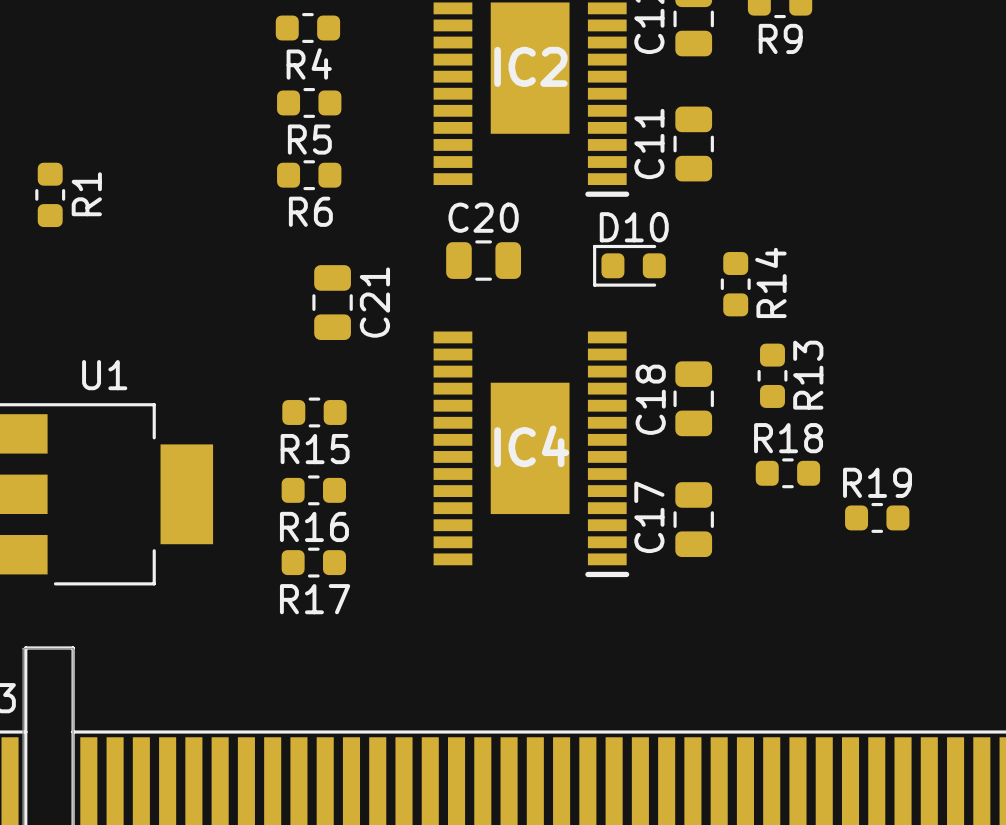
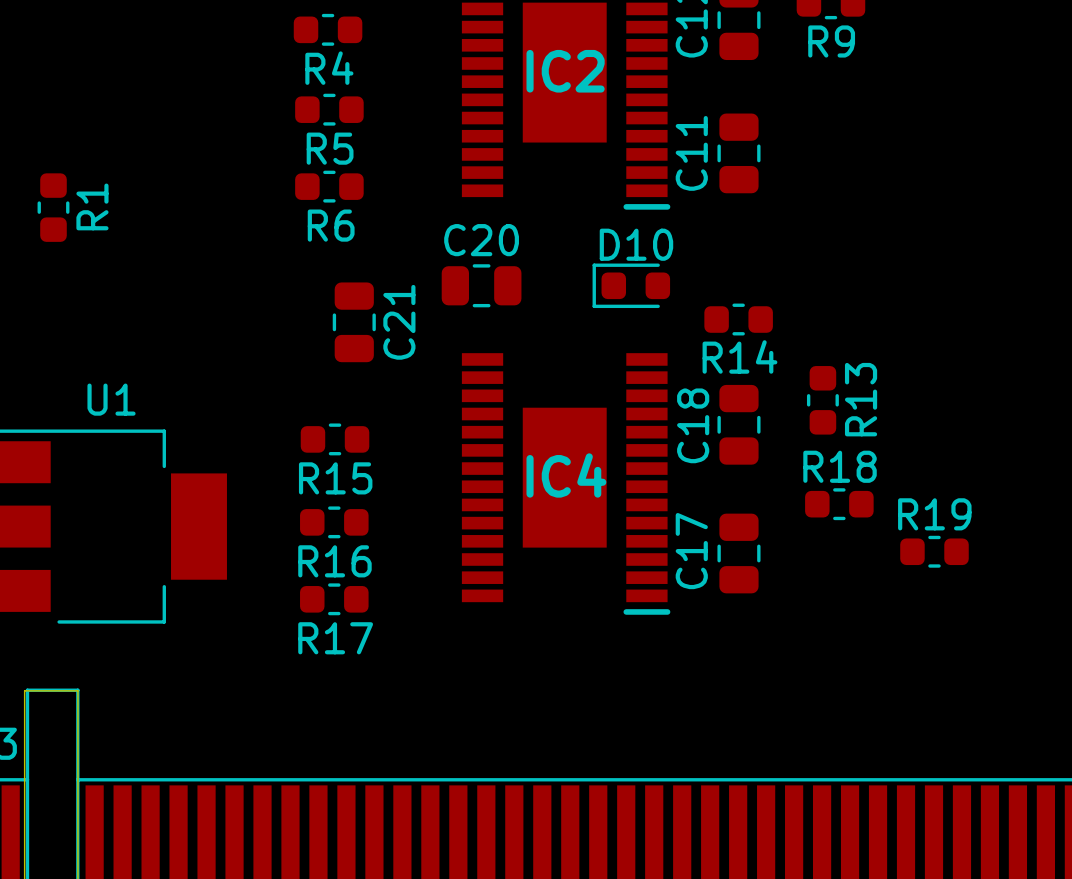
C20 position: (483, 260) -> (481, 285)
D10 position: (629, 265) -> (631, 285)
R14 rotation: 0° (735, 284) -> 90° clockwise (738, 319)
R14 position: (735, 284) -> (738, 319)

